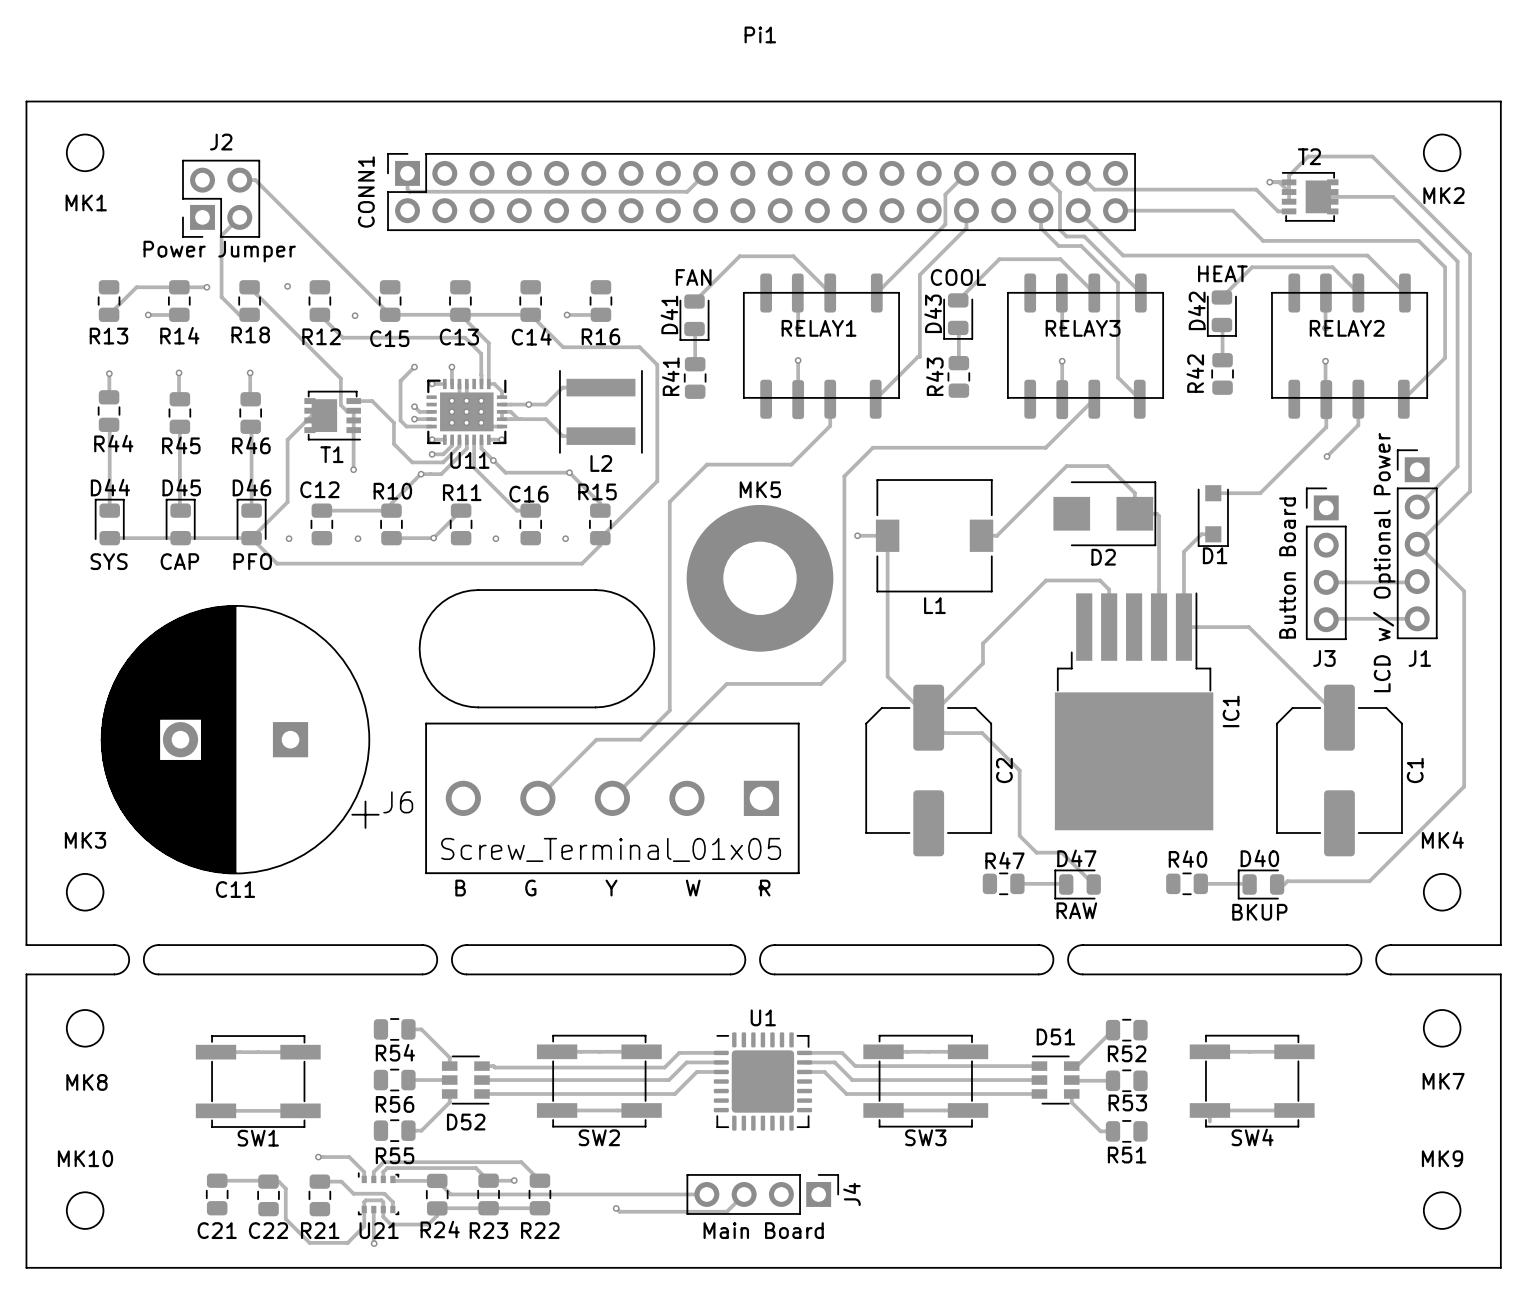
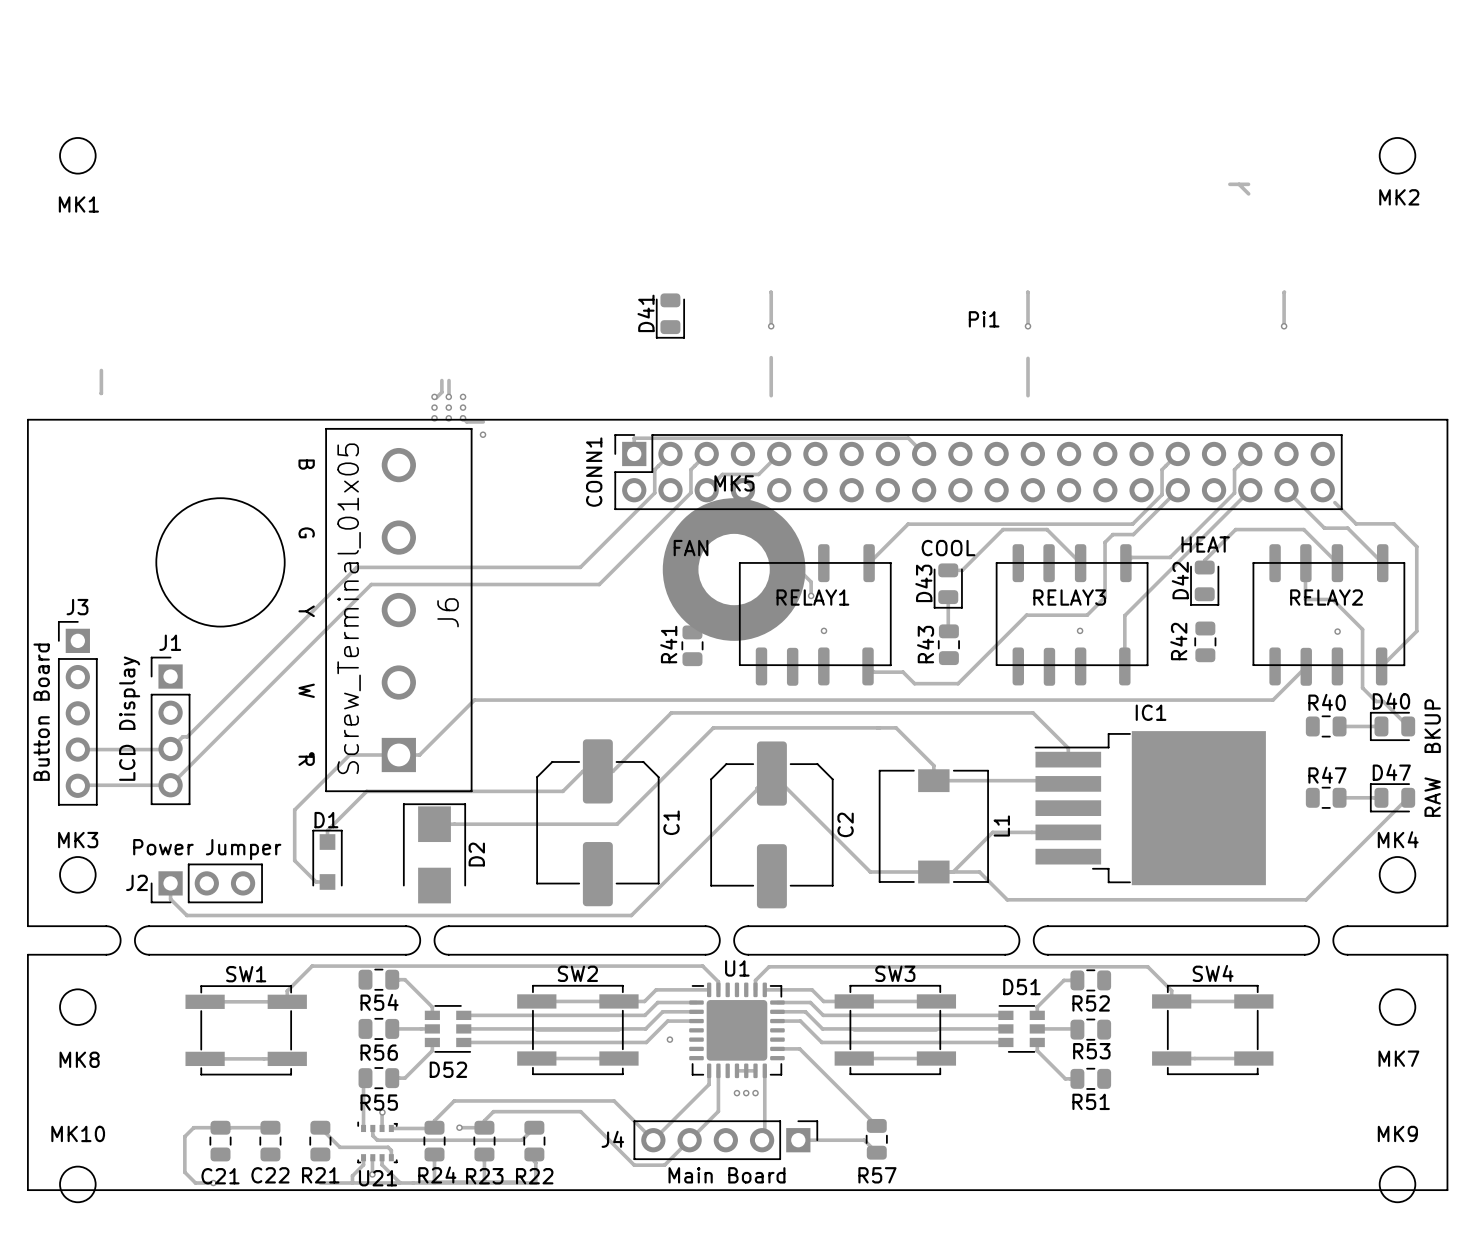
Pi1 position: (760, 34) -> (984, 319)
J2 name position: J2 (221, 142) -> J2 (136, 882)
J2 footprint: [182, 159, 261, 238] -> [150, 863, 263, 904]
track: (407, 173) (407, 189) (409, 191) (687, 191) (705, 173) -> none
track: (966, 173) (945, 194) (945, 224) (876, 293) -> none
track: (1041, 173) (1060, 192) (1060, 229) (1066, 236) (1084, 236) (1140, 293) -> none
track: (1078, 173) (1094, 189) (1256, 189) (1278, 211) (1289, 211) -> none
track: (239, 180) (255, 180) (390, 314) (530, 314) (563, 347) (639, 347) (657, 364) (657, 443) -> (924, 453) (908, 438) (634, 438)
via: (1269, 182) -> none
CONN1 position: (761, 192) -> (978, 472)
T2: (1310, 196) -> none
track: (1318, 196) (1393, 196) (1457, 261) (1457, 466) (1417, 507) -> none
track: (1289, 201) (1289, 175) (1308, 156) (1372, 156) (1470, 254) (1470, 491) (1417, 544) (1464, 591) (1464, 786) (1369, 881) (1287, 881) (1284, 884) (1277, 884) -> none
track: (966, 210) (966, 228) (919, 274) (919, 356) (875, 399) -> none
track: (1041, 210) (1041, 228) (1058, 246) (1081, 246) (1117, 282) (1117, 377) (1139, 399) -> none
track: (1078, 210) (1123, 255) (1367, 255) (1404, 293) -> none
track: (1115, 210) (1232, 210) (1263, 240) (1418, 240) (1445, 267) (1445, 357) (1403, 399) -> none
track: (239, 217) (221, 235) (221, 297) (239, 314) (249, 314) -> none
text: Power Jumper (219, 251) -> none
text position: HEAT (1222, 273) -> HEAT (1205, 544)
text position: FAN (693, 277) -> FAN (691, 548)
text position: COOL (958, 277) -> COOL (948, 548)
via: (287, 286) -> none
track: (206, 287) (136, 287) (109, 314) -> none
via: (206, 287) -> none
track: (249, 287) (340, 378) (340, 405) (346, 410) (353, 410) (353, 430) -> none
track: (830, 293) (793, 256) (739, 256) (694, 301) -> none
track: (1094, 293) (1060, 259) (999, 259) (958, 300) -> none
track: (1358, 293) (1332, 267) (1252, 267) (1221, 297) -> none
R13: (109, 301) -> none
R14: (179, 301) -> none
R18: (249, 301) -> none
R12: (319, 301) -> none
C15: (390, 301) -> none
C13: (460, 301) -> none
C14: (530, 301) -> none
R16: (600, 301) -> none
D42 position: (1221, 313) -> (1204, 583)
track: (148, 314) (179, 314) -> none
via: (148, 314) -> none
track: (319, 314) (342, 337) (465, 337) (481, 353) (481, 384) -> none
track: (460, 314) (488, 343) (488, 384) (494, 384) (502, 391) (502, 397) -> none
track: (567, 314) (600, 314) -> none
via: (567, 314) -> none
via: (355, 315) -> none
D43 position: (958, 316) -> (948, 586)
track: (1221, 324) (1222, 360) -> none
track: (958, 327) (958, 363) -> none
track: (694, 329) (695, 364) -> none
RELAY1 position: (821, 346) -> (815, 614)
RELAY3 position: (1085, 346) -> (1072, 614)
RELAY2 position: (1349, 346) -> (1328, 614)
via: (798, 360) -> none
via: (1062, 361) -> none
track: (1325, 361) (1326, 427) (1260, 493) (1213, 493) -> none
via: (1325, 361) -> none
track: (414, 367) (400, 380) (400, 420) (406, 426) (431, 426) -> none
via: (414, 367) -> none
track: (451, 367) (452, 384) -> none
via: (451, 367) -> none
track: (179, 372) (179, 399) -> none
via: (179, 372) -> none
track: (250, 372) (250, 399) -> none
via: (250, 372) -> none
via: (109, 373) -> none
R42 position: (1222, 373) -> (1205, 641)
R43 position: (958, 376) -> (948, 644)
R41 position: (695, 377) -> (692, 645)
via: (432, 383) -> none
track: (432, 384) (444, 384) -> none
track: (600, 387) (562, 387) (545, 404) (502, 404) -> none
track: (830, 399) (830, 425) (791, 464) (707, 464) (669, 501) (669, 710) (640, 739) (596, 739) (537, 798) -> none
track: (1094, 399) (1045, 447) (872, 447) (844, 476) (844, 660) (821, 683) (726, 683) (612, 798) -> none
track: (1358, 399) (1358, 425) (1327, 456) -> none
track: (353, 401) (372, 401) (393, 422) (393, 444) (412, 462) (443, 462) (459, 446) (459, 439) -> none
via: (528, 404) -> none
track: (414, 406) (419, 411) (431, 411) -> none
via: (414, 406) -> none
R44: (109, 411) -> none
U11: (466, 411) -> none
L2: (600, 411) -> none
R45: (179, 413) -> none
R46: (250, 413) -> none
track: (324, 415) (311, 415) (287, 439) (287, 502) (251, 538) -> none
T1: (332, 415) -> none
track: (414, 419) (431, 419) -> none
via: (414, 419) -> none
track: (520, 419) (545, 419) (562, 436) (600, 436) -> none
track: (520, 419) (518, 419) (510, 411) (502, 411) (502, 419) (520, 419) -> none
track: (109, 424) (109, 510) -> none
track: (179, 426) (180, 510) -> none
track: (250, 426) (251, 510) -> none
track: (353, 430) (353, 469) -> none
track: (432, 439) (444, 439) -> none
via: (432, 439) -> none
track: (452, 439) (452, 445) (443, 454) (432, 454) -> none
track: (466, 439) (466, 448) (441, 474) (420, 474) (391, 503) (391, 510) (321, 510) -> none
track: (474, 439) (474, 467) (517, 510) (530, 510) -> none
track: (481, 439) (481, 448) (505, 472) (569, 472) (600, 503) (600, 510) -> none
track: (488, 439) (501, 439) -> none
J1 footprint: [1396, 449, 1438, 640] -> [150, 656, 191, 806]
via: (432, 454) -> none
via: (1327, 456) -> none
track: (657, 459) (657, 481) (600, 538) (600, 545) (582, 563) (277, 563) (251, 538) -> none
track: none -> (670, 453) (654, 469) (654, 493) (580, 567) (356, 567) (187, 736) (182, 736) (170, 749) (77, 749)
track: none -> (706, 453) (690, 469) (690, 492) (599, 584) (371, 584) (170, 785) (77, 785)
track: none -> (779, 453) (758, 474) (722, 474) (706, 490)
track: none -> (1177, 453) (1162, 469) (1162, 494) (1132, 524) (908, 524) (869, 563)
track: none -> (1250, 453) (1234, 469) (1234, 493) (1170, 557) (1131, 557) (1125, 563)
via: (493, 460) -> none
via: (353, 469) -> none
via: (569, 472) -> none
via: (421, 474) -> none
J3 footprint: [1305, 487, 1347, 641] -> [58, 621, 98, 806]
track: none -> (1177, 490) (1133, 534) (1112, 534) (1105, 542) (1105, 597) (1087, 615) (1026, 615) (958, 683) (914, 683) (903, 672) (873, 672) (868, 666)
track: none -> (1250, 490) (1124, 615) (1124, 666)
track: none -> (1286, 490) (1324, 528) (1347, 528) (1382, 563)
round board edge: none -> [155, 497, 286, 628]
track: none -> (1334, 502) (1356, 523) (1393, 523) (1416, 546) (1416, 631) (1381, 666)
track: (461, 510) (433, 538) (391, 538) -> none
D2 rotation: 0° (1104, 513) -> 90° counterclockwise (434, 853)
D2 position: (1104, 513) -> (434, 853)
D1 rotation: 0° (1213, 516) -> 180° (327, 859)
D1 position: (1213, 516) -> (327, 859)
D44: (109, 522) -> none
D45: (180, 522) -> none
D46: (251, 522) -> none
C12: (321, 524) -> none
R10: (391, 524) -> none
R11: (461, 524) -> none
C16: (530, 524) -> none
R15: (600, 524) -> none
track: (1213, 534) (1201, 534) (1183, 551) (1183, 627) (1248, 627) (1339, 717) -> none
track: (857, 535) (887, 535) (887, 676) (944, 733) (982, 733) (1019, 770) (1019, 835) (1036, 852) (1061, 852) (1093, 884) -> none
via: (857, 535) -> none
L1 rotation: 0° (934, 535) -> 90° clockwise (933, 826)
L1 position: (934, 535) -> (933, 826)
track: (981, 535) (996, 535) (1066, 466) (1107, 466) (1134, 493) (1134, 513) (1156, 513) (1159, 515) (1159, 627) -> none
track: (109, 538) (251, 538) -> none
via: (289, 538) -> none
via: (358, 538) -> none
via: (433, 538) -> none
via: (495, 538) -> none
via: (565, 538) -> none
text: SYS (109, 561) -> none
text: CAP (179, 561) -> none
text: PFO (252, 561) -> none
text: LCD w/ Optional Power (1384, 562) -> none
text: Button Board (1287, 568) -> none
track: none -> (792, 563) (811, 582) (811, 595)
track: none -> (1080, 563) (1047, 529) (1003, 529) (962, 570) (948, 570)
track: none -> (1305, 563) (1305, 599) (1332, 599) (1362, 629) (1362, 687) (1376, 701) (1383, 701) (1408, 726)
track: none -> (1337, 563) (1303, 529) (1235, 529) (1204, 560) (1204, 567)
track: (1417, 581) (1326, 582) -> none
board edge: (478, 590) (595, 590) (610, 592) (625, 597) (642, 613) (652, 633) (653, 656) (646, 678) (637, 690) (625, 699) (603, 706) (478, 707) (463, 705) (448, 699) (431, 684) (424, 671) (419, 648) (421, 633) (427, 619) (442, 602) (455, 594) (478, 590) -> none
via: none -> (811, 595)
L1 name position: L1 (934, 605) -> L1 (1001, 825)
track: none -> (948, 597) (948, 631)
track: (1417, 618) (1326, 619) -> none
text: none -> B G Y W R (306, 612)
track: (1109, 627) (1109, 589) (1100, 580) (1046, 580) (982, 643) (982, 663) (928, 717) -> none
via: none -> (823, 630)
via: none -> (1080, 630)
via: none -> (1337, 631)
J3 name position: J3 (1324, 658) -> J3 (77, 607)
J1 name position: J1 (1419, 658) -> J1 (170, 642)
track: none -> (1306, 666) (1272, 700) (474, 700) (419, 755) (349, 755) (294, 809) (294, 860) (316, 881) (327, 881)
IC1 rotation: 0° (1134, 711) -> 90° counterclockwise (1150, 808)
text: none -> Button Board (41, 712)
text: none -> LCD Display (129, 718)
C11: (240, 739) -> none
track: none -> (1339, 726) (1381, 726)
C2 position: (928, 770) -> (771, 824)
C1 position: (1339, 770) -> (597, 822)
track: none -> (1068, 759) (1068, 748) (1033, 712) (671, 712) (612, 771) (582, 771) (562, 791) (366, 791) (327, 830) (327, 842)
track: none -> (1068, 783) (1065, 780) (933, 780) (933, 765) (896, 727) (713, 727) (617, 824) (434, 824)
J6 name position: J6 (398, 802) -> J6 (448, 612)
J6 rotation: 0° (612, 806) -> 90° clockwise (390, 610)
J6 position: (612, 806) -> (390, 610)
text: none -> RAW (1432, 797)
track: none -> (1339, 797) (1381, 797)
track: none -> (1408, 797) (1306, 899) (1007, 899) (979, 871) (870, 871) (771, 773) (631, 915) (186, 915) (170, 899) (170, 883)
MK3 name position: MK3 (85, 840) -> MK3 (78, 840)
MK4 name position: MK4 (1442, 840) -> MK4 (1398, 839)
track: none -> (1068, 832) (992, 832) (953, 871)
text: none -> Power Jumper (207, 849)
R47 position: (1003, 883) -> (1326, 797)
track: (1017, 883) (1066, 884) -> none
R40 position: (1187, 883) -> (1326, 726)
track: (1200, 883) (1248, 883) -> none
D47 position: (1077, 884) -> (1392, 797)
D40 position: (1261, 884) -> (1392, 726)
text: B G Y W R (612, 888) -> none
text: RAW (1076, 910) -> none
text rotation: 0° (1259, 912) -> 90° counterclockwise (1432, 726)
text position: BKUP (1259, 912) -> BKUP (1432, 726)
board edge: (33, 945) (26, 945) (26, 101) (1500, 101) (1500, 945) (1493, 945) -> (27, 926) (27, 419) (1447, 419) (1447, 926)
board edge: (33, 974) (26, 974) (26, 1267) (1500, 1267) (1500, 974) (1493, 974) -> (27, 954) (27, 1190) (1447, 1190) (1447, 954)
track: none -> (392, 979) (404, 979) (432, 1007) (432, 1015)
track: none -> (1077, 980) (1063, 980) (1037, 1007) (1037, 1015)
track: none -> (709, 989) (656, 989) (644, 1001) (536, 1001)
track: none -> (718, 989) (718, 981) (702, 966) (312, 966) (287, 991) (287, 1001) (205, 1001)
track: none -> (755, 989) (755, 980) (769, 966) (1147, 966) (1171, 990) (1171, 1001) (1253, 1001)
track: none -> (764, 989) (812, 989) (823, 1001) (936, 1001)
track: none -> (696, 1002) (657, 1002) (644, 1015) (463, 1015)
track: none -> (777, 1002) (810, 1002) (823, 1015) (1005, 1015)
R54 position: (394, 1029) -> (378, 979)
track: (408, 1029) (421, 1029) (449, 1057) (449, 1064) -> none
track: (1113, 1030) (1077, 1066) (1071, 1066) -> none
R52 position: (1126, 1030) -> (1090, 980)
track: none -> (777, 1011) (805, 1011) (822, 1028) (1005, 1028)
track: none -> (696, 1021) (667, 1021) (646, 1042) (463, 1042)
track: none -> (777, 1021) (800, 1021) (821, 1042) (1005, 1042)
track: none -> (1037, 1028) (1077, 1029)
track: (1209, 1051) (1294, 1051) -> (1171, 1058) (1253, 1058)
track: (216, 1052) (300, 1052) -> none
track: (721, 1052) (679, 1052) (664, 1067) (481, 1066) -> none
track: (804, 1052) (842, 1052) (855, 1066) (1039, 1066) -> none
via: none -> (669, 1039)
track: (721, 1062) (686, 1062) (669, 1080) (481, 1080) -> (696, 1011) (662, 1011) (645, 1028) (463, 1028)
track: (804, 1062) (834, 1062) (852, 1080) (1039, 1080) -> none
track: none -> (432, 1043) (432, 1050) (404, 1078) (392, 1078)
track: (721, 1071) (696, 1071) (674, 1093) (481, 1093) -> none
track: (804, 1071) (824, 1071) (846, 1093) (1039, 1093) -> none
track: none -> (777, 1048) (799, 1048) (876, 1125)
R56 position: (394, 1080) -> (378, 1028)
track: (408, 1080) (449, 1080) -> (392, 1028) (432, 1028)
D52 position: (465, 1080) -> (448, 1028)
D51 position: (1055, 1080) -> (1021, 1028)
track: (1071, 1080) (1113, 1080) -> none
R53 position: (1126, 1080) -> (1090, 1029)
SW1 rotation: 0° (258, 1081) -> 180° (246, 1030)
SW2 rotation: 0° (599, 1081) -> 180° (577, 1029)
U1 position: (762, 1081) -> (736, 1030)
SW3 rotation: 0° (925, 1081) -> 180° (895, 1029)
SW4 rotation: 0° (1252, 1081) -> 180° (1212, 1029)
track: (449, 1093) (449, 1102) (421, 1130) (408, 1130) -> none
track: none -> (709, 1070) (709, 1084) (653, 1140) (614, 1100) (454, 1100) (434, 1120) (433, 1128) (391, 1128)
track: none -> (718, 1070) (718, 1111) (664, 1165) (634, 1165) (580, 1111) (493, 1111) (484, 1120) (484, 1127) (459, 1127)
track: none -> (736, 1070) (755, 1070)
track: none -> (764, 1070) (764, 1137) (762, 1140)
track: (1071, 1093) (1071, 1102) (1100, 1131) (1113, 1131) -> (1037, 1042) (1037, 1050) (1065, 1078) (1077, 1078)
track: none -> (365, 1078) (363, 1080) (363, 1128)
track: (216, 1110) (300, 1110) -> (205, 1058) (287, 1058)
track: (557, 1110) (641, 1110) -> (536, 1058) (618, 1058)
track: (883, 1110) (968, 1110) -> (854, 1058) (936, 1058)
track: (1294, 1110) (1209, 1110) (1209, 1121) -> none
via: none -> (736, 1093)
via: none -> (746, 1093)
via: none -> (755, 1093)
R55 position: (394, 1130) -> (378, 1078)
R51 position: (1126, 1131) -> (1090, 1078)
track: none -> (382, 1112) (382, 1128)
via: none -> (382, 1112)
track: none -> (270, 1127) (193, 1127) (184, 1136) (184, 1172) (195, 1183) (213, 1183)
track: none -> (320, 1127) (339, 1147) (388, 1147) (391, 1150) (391, 1157)
track: none -> (534, 1127) (521, 1140) (377, 1140) (372, 1135) (372, 1128)
track: (318, 1157) (349, 1157) (364, 1172) (364, 1179) -> none
via: (318, 1157) -> none
R57: none -> (876, 1139)
track: none -> (798, 1140) (864, 1140) (876, 1152)
J4 footprint: [686, 1174, 840, 1215] -> [633, 1120, 819, 1161]
track: (373, 1179) (373, 1172) (383, 1162) (521, 1162) (539, 1180) -> none
track: (383, 1179) (383, 1172) (387, 1168) (475, 1168) (488, 1180) (514, 1180) -> none
track: (392, 1179) (437, 1180) (450, 1194) (706, 1194) -> none
track: none -> (434, 1154) (434, 1183)
track: none -> (484, 1154) (484, 1183)
track: none -> (534, 1154) (535, 1183) (320, 1183)
track: (217, 1180) (278, 1181) (285, 1188) (285, 1219) (309, 1242) (347, 1242) (364, 1226) (364, 1202) (366, 1200) (381, 1200) (383, 1202) (383, 1216) (390, 1224) (428, 1224) (437, 1215) (437, 1208) -> none
via position: (514, 1180) -> (459, 1127)
track: (319, 1181) (341, 1181) (353, 1193) (384, 1193) (392, 1202) (392, 1209) -> none
track: none -> (363, 1157) (363, 1164) (352, 1175) (352, 1183)
track: none -> (372, 1157) (372, 1174)
track: none -> (382, 1157) (382, 1164) (399, 1183)
U21 position: (378, 1193) -> (377, 1142)
C21 position: (217, 1194) -> (220, 1141)
R24 position: (437, 1194) -> (434, 1141)
R23 position: (488, 1194) -> (484, 1141)
R22 position: (539, 1194) -> (534, 1141)
track: (744, 1194) (726, 1211) (619, 1211) (616, 1208) -> none
J4 name position: J4 (851, 1194) -> J4 (612, 1139)
C22 position: (268, 1195) -> (270, 1141)
R21 position: (319, 1195) -> (320, 1141)
via: none -> (372, 1174)
via: (616, 1208) -> none
via: none -> (213, 1183)
track: (373, 1209) (374, 1243) -> none
text position: Main Board (763, 1230) -> Main Board (726, 1175)
via: (374, 1243) -> none

